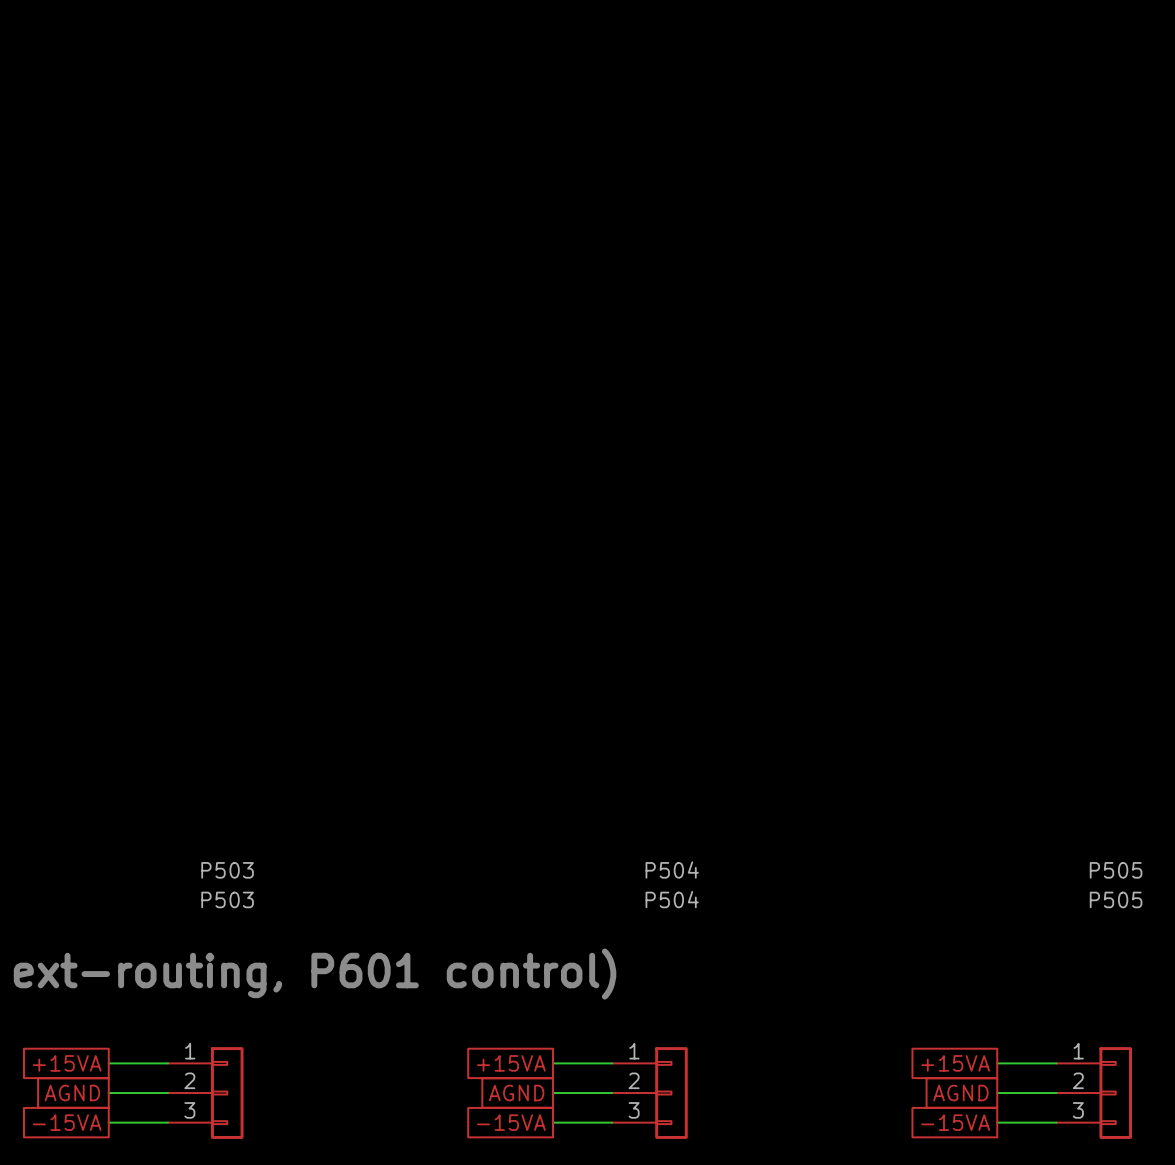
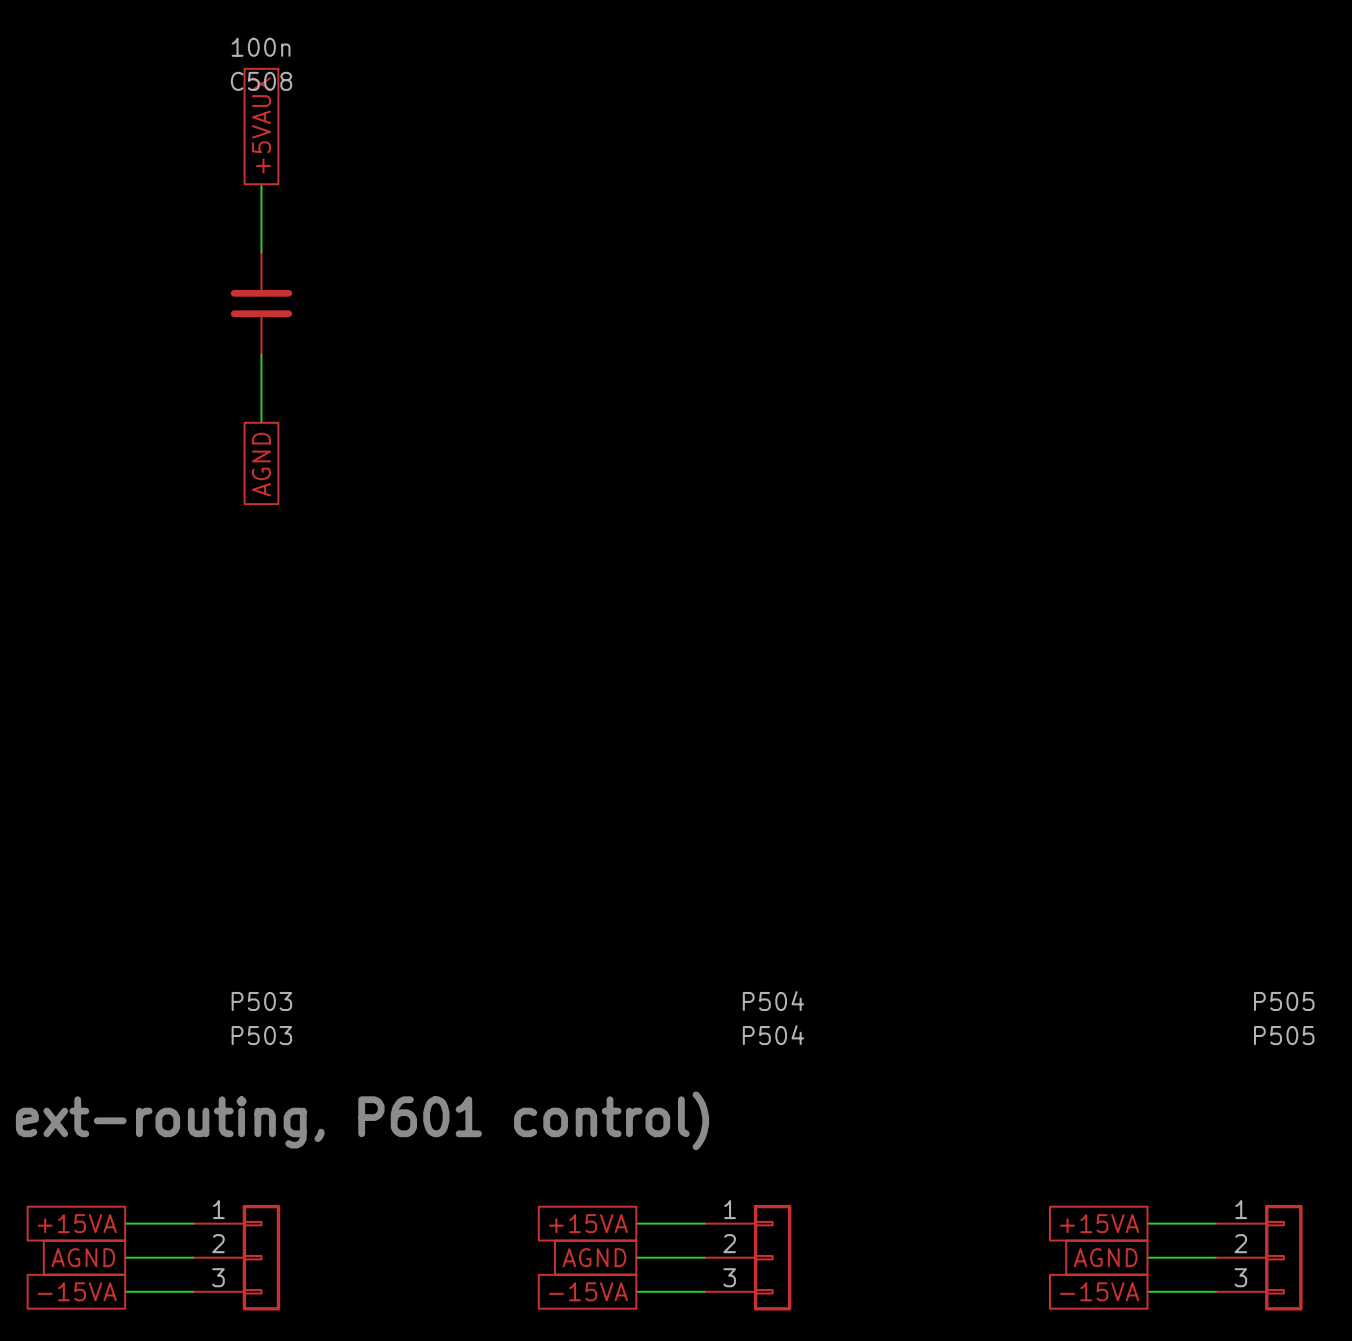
global label: none -> +5VAUX (261, 125)
wire: none -> (261, 184) (261, 252)
C508: none -> 100n (261, 303)
wire: none -> (261, 354) (261, 422)
global label: none -> AGND (261, 464)

